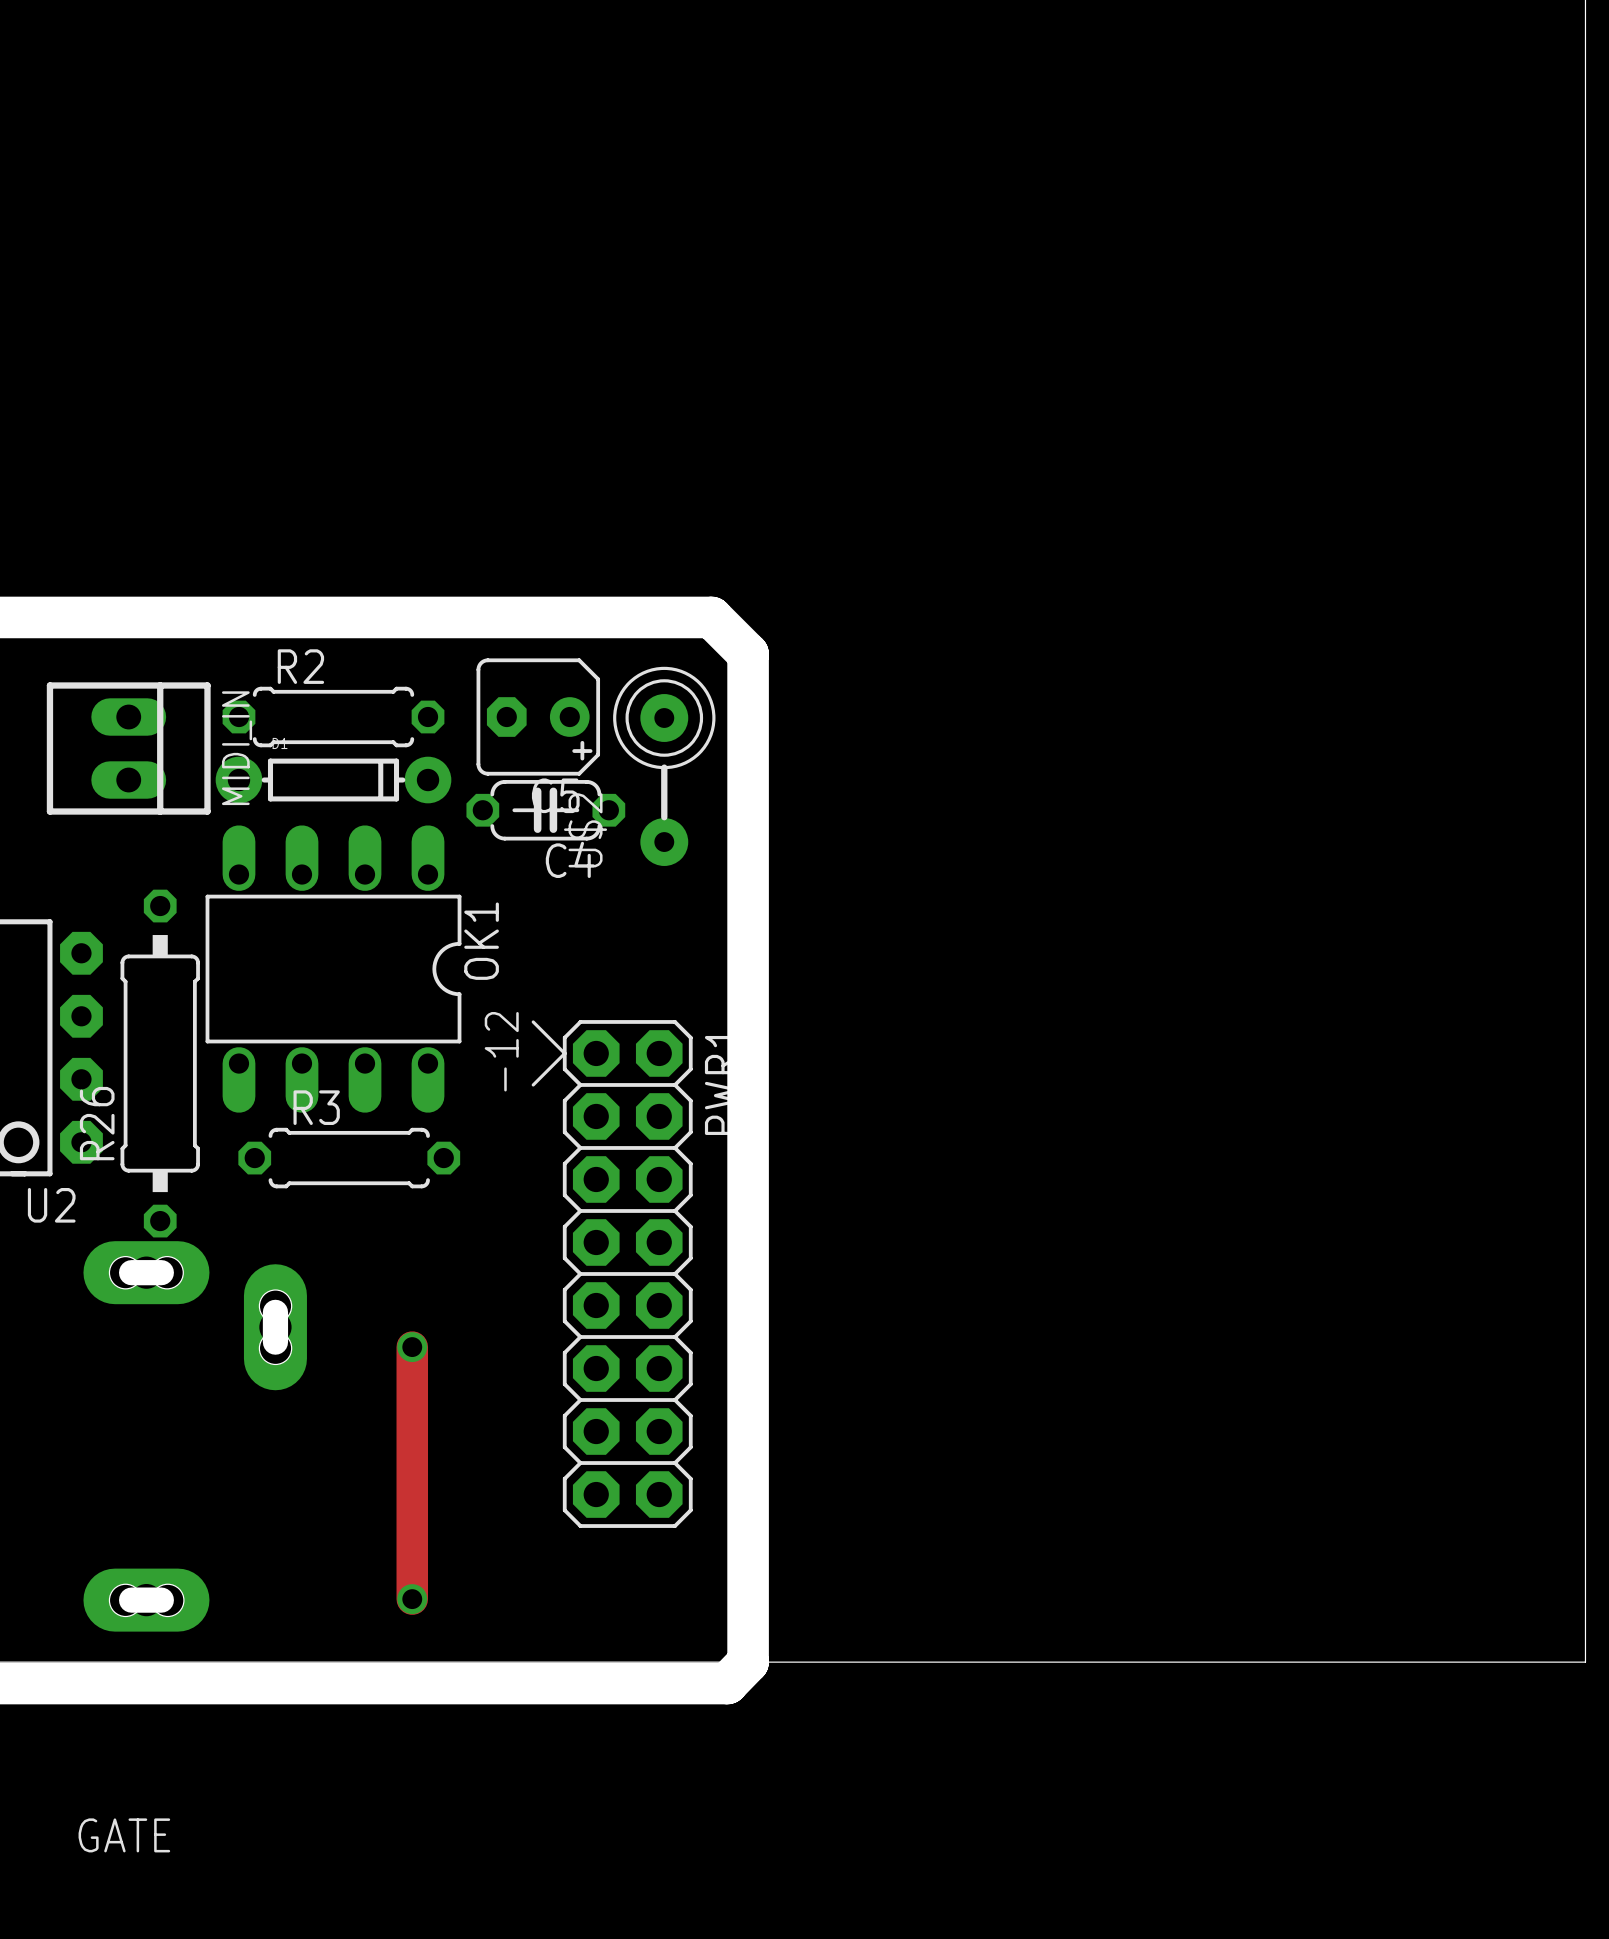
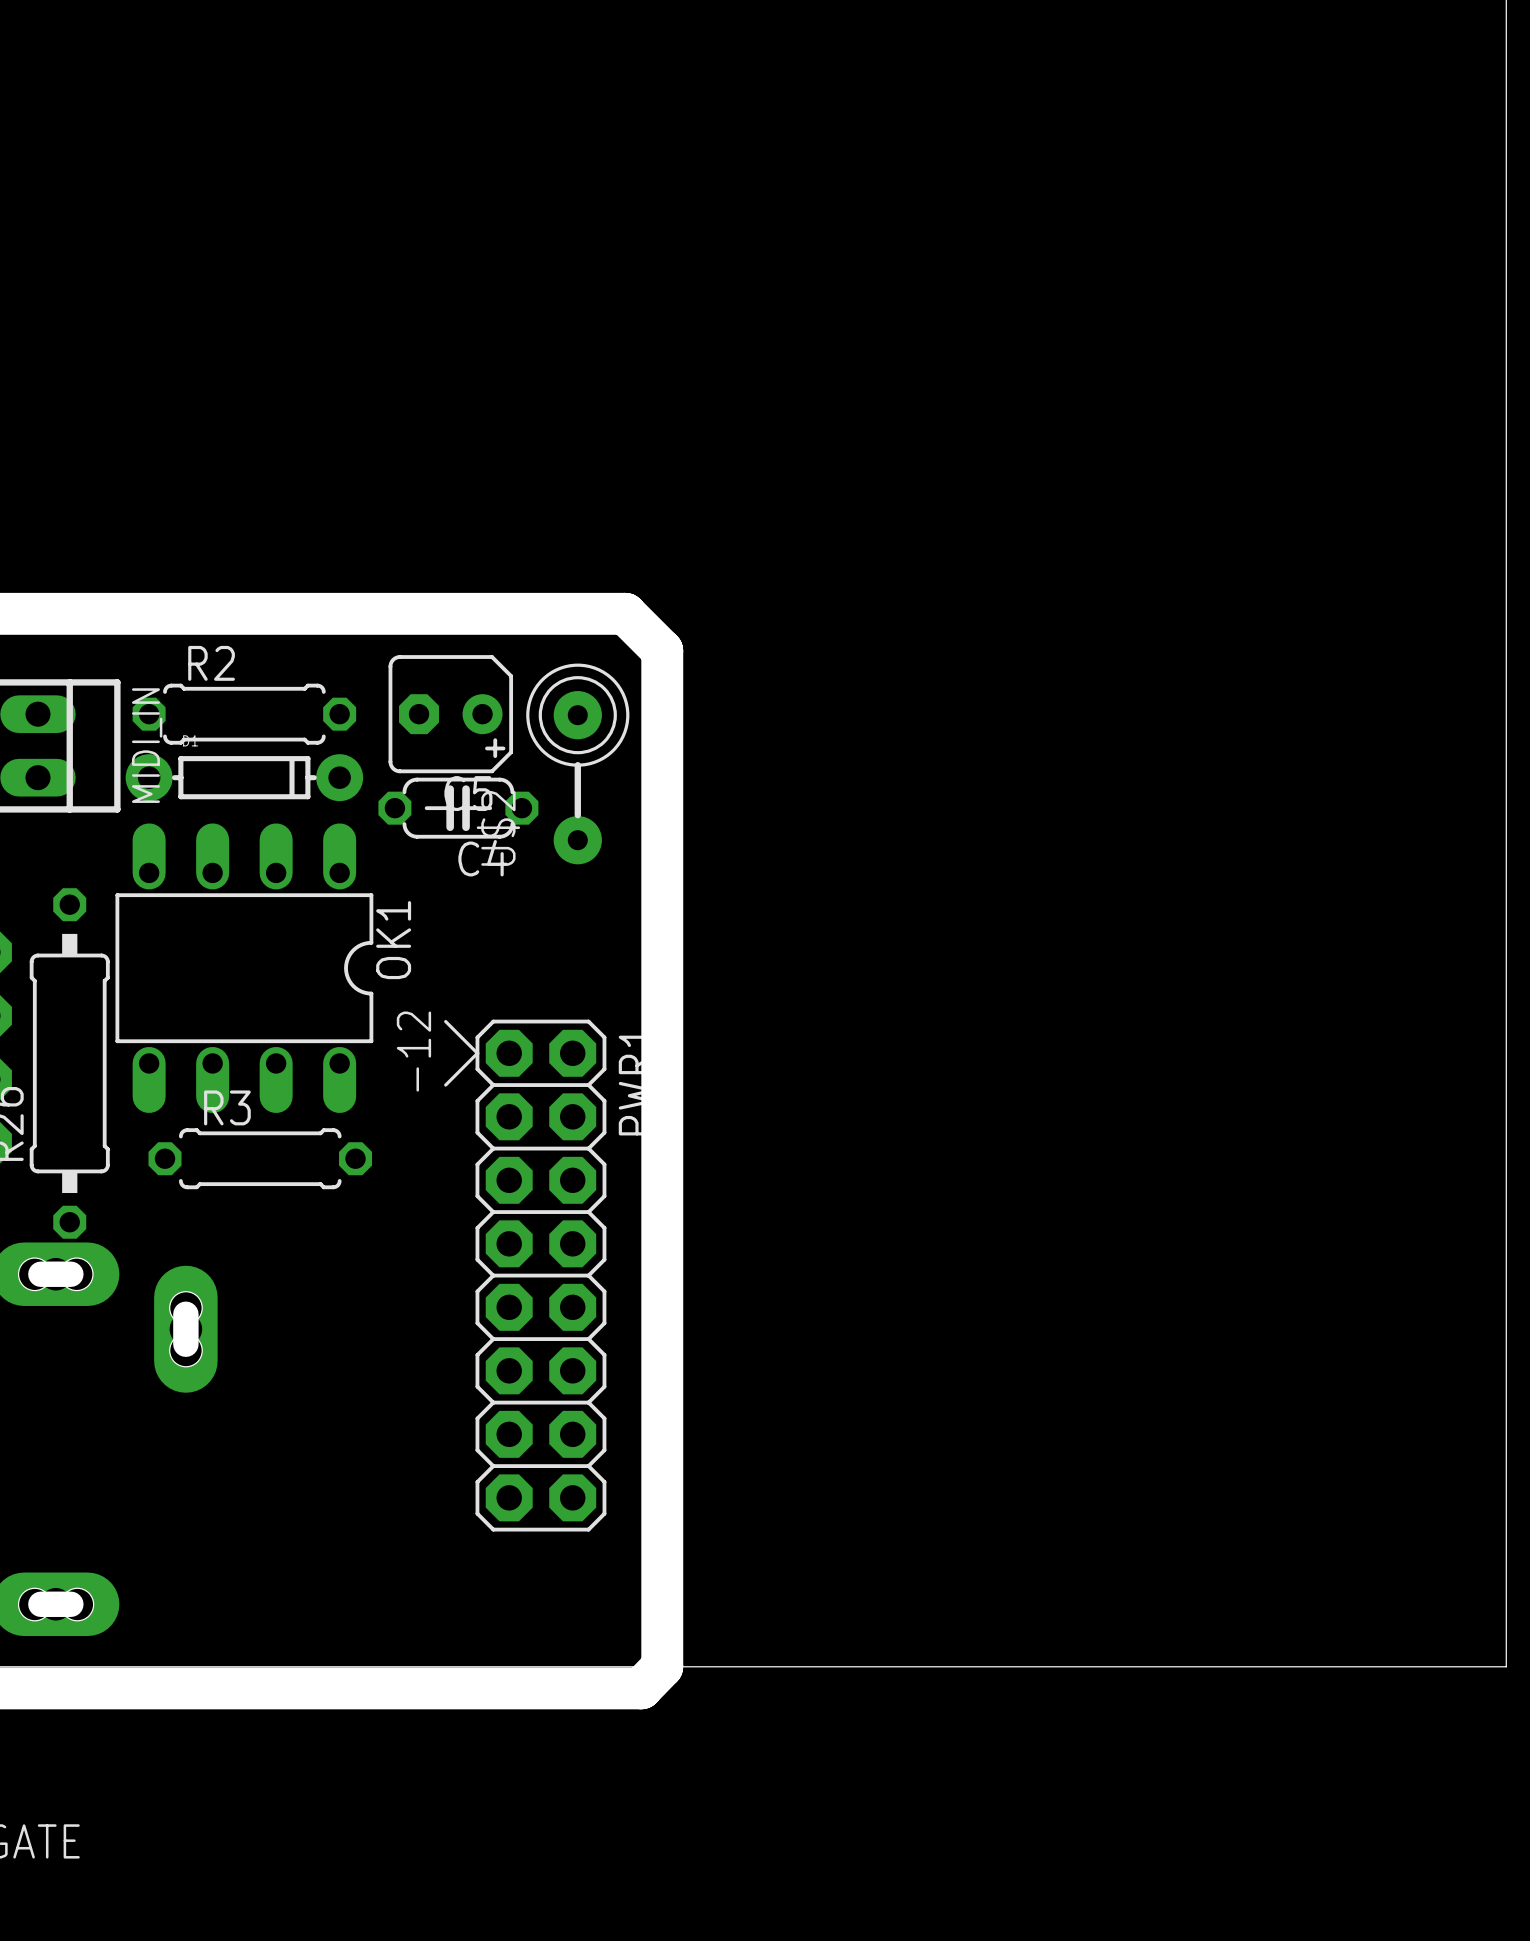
track: (412, 1347) (412, 1599) -> none
via: (412, 1347) -> none
via: (412, 1599) -> none

